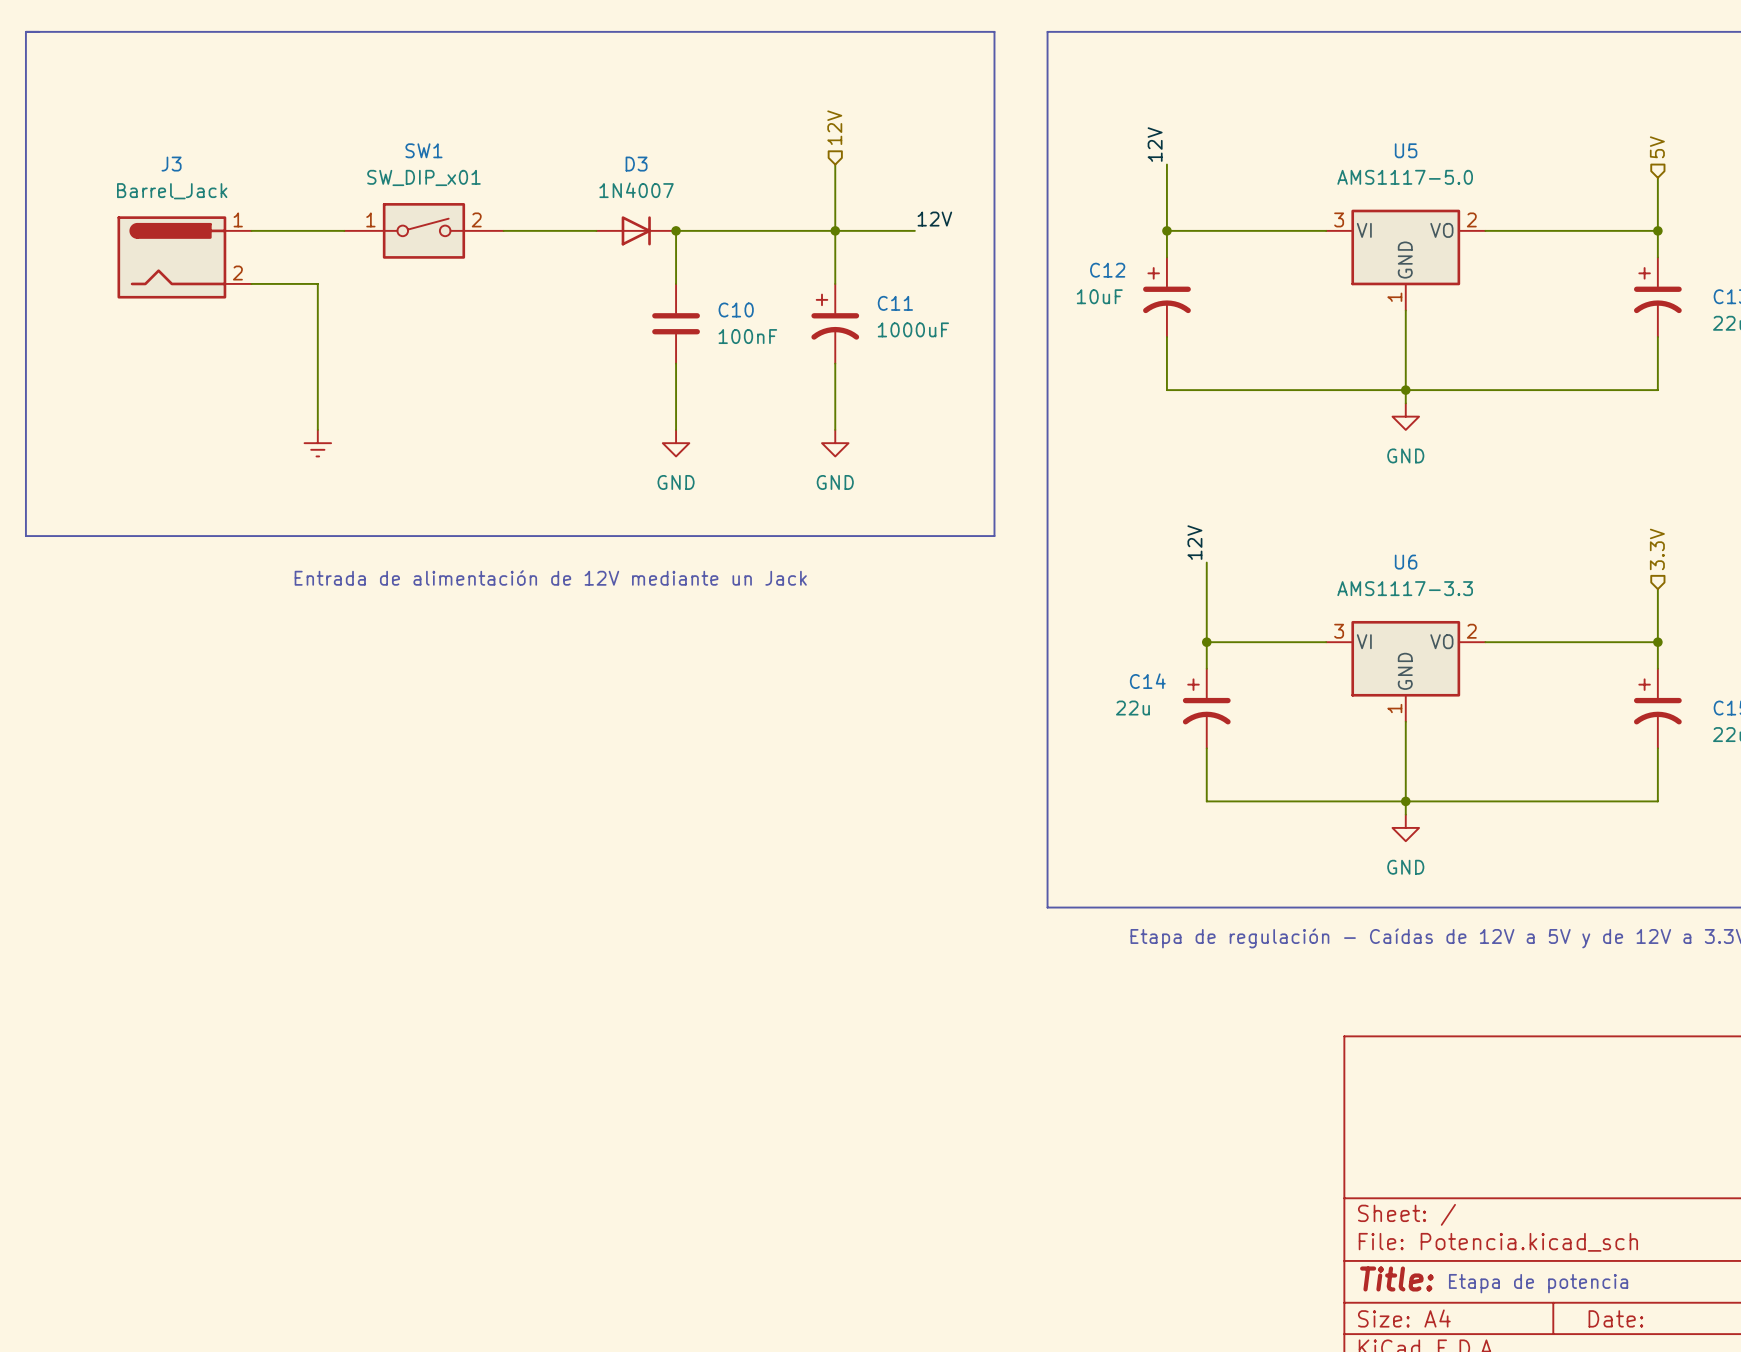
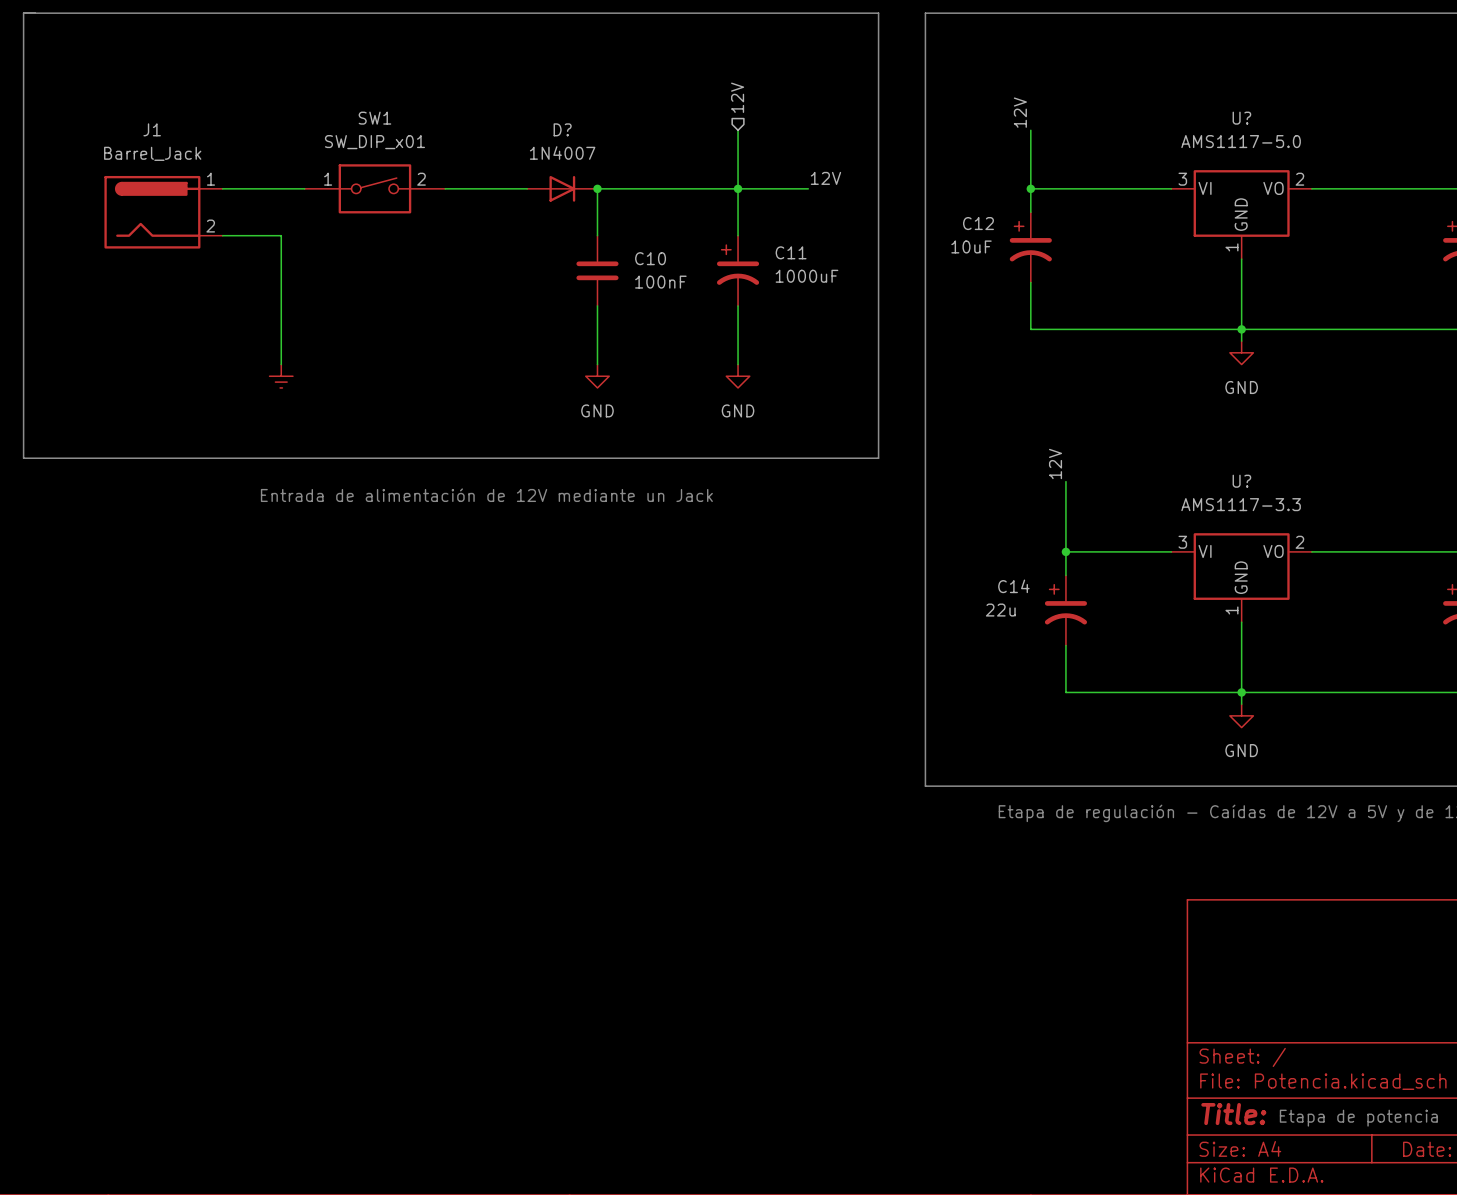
U5 name: U5 (1406, 150) -> U? (1241, 118)
J3 name: J3 (171, 164) -> J1 (152, 129)
D3 name: D3 (636, 164) -> D? (562, 129)
U6 name: U6 (1406, 562) -> U? (1241, 481)

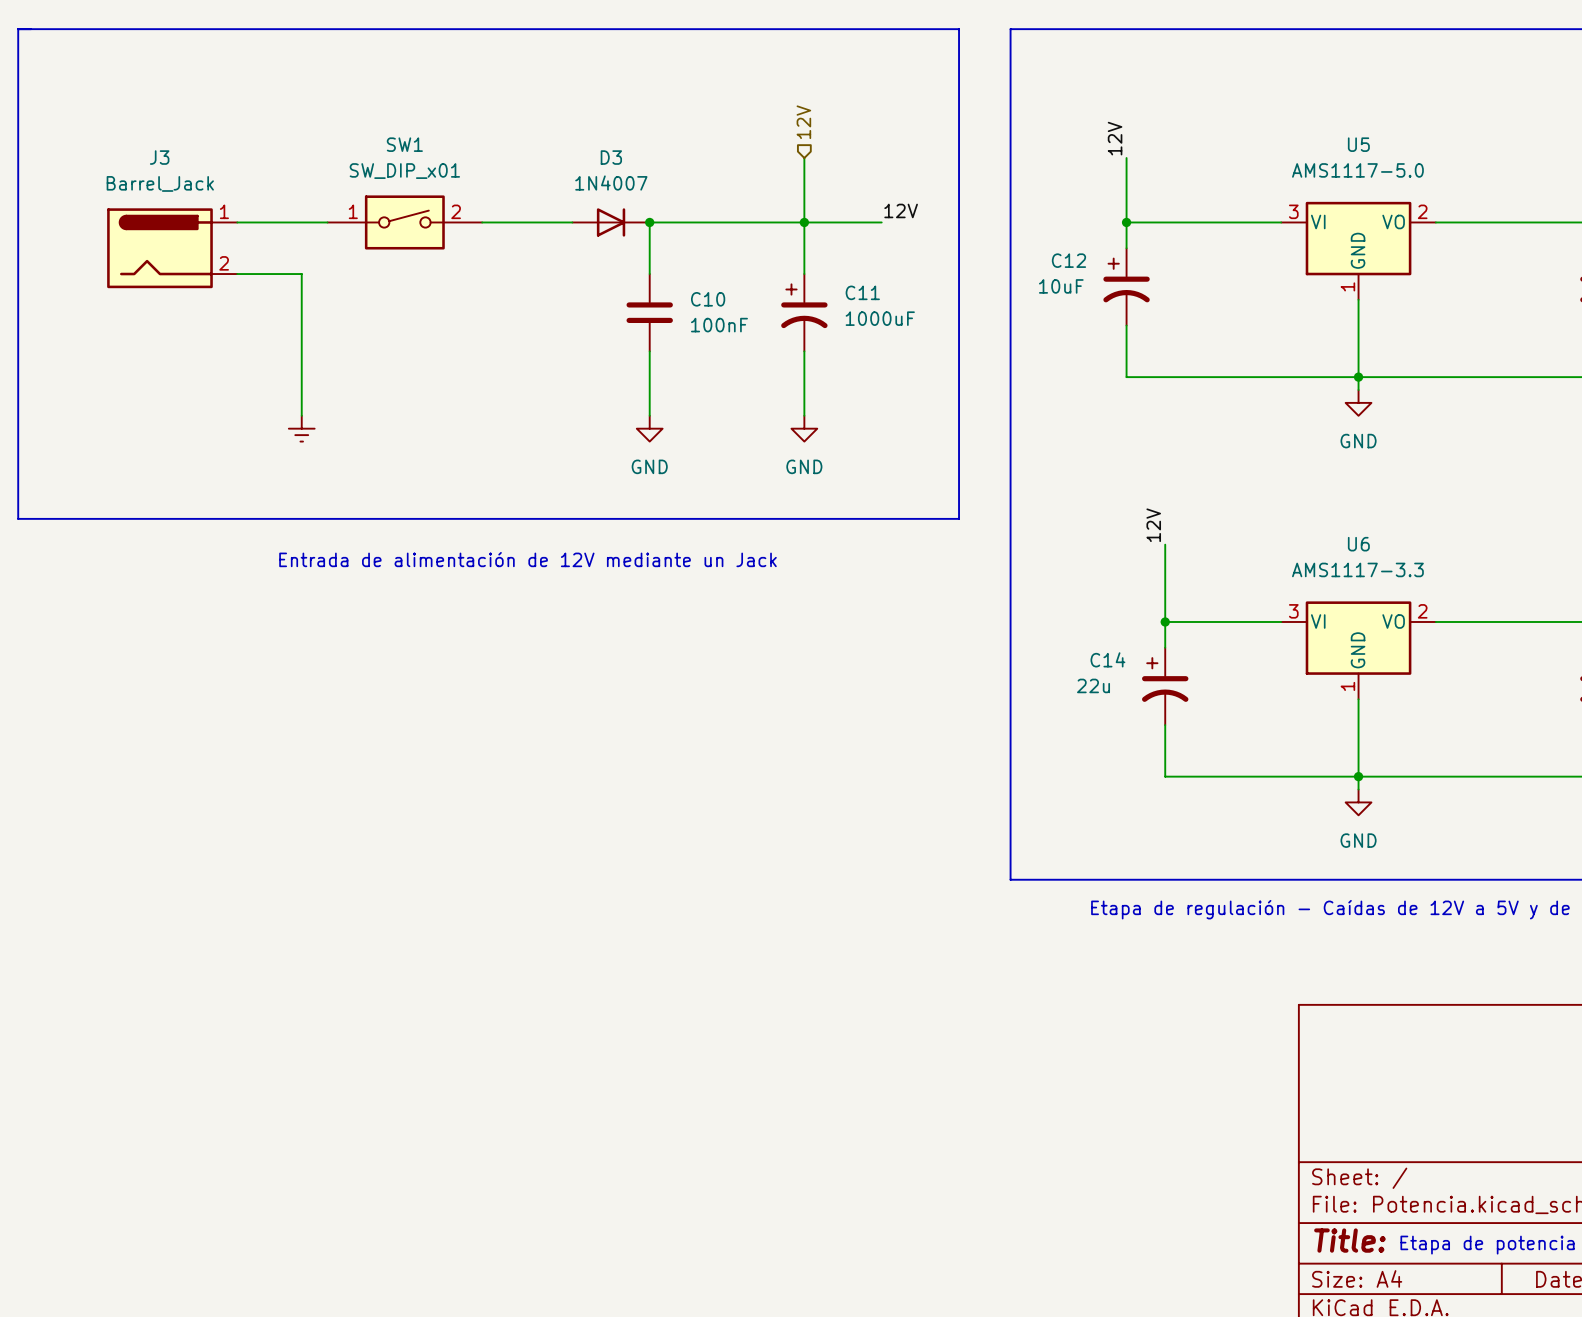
U? name: U? (1241, 118) -> U5 (1358, 144)
J1 name: J1 (152, 129) -> J3 (159, 157)
D? name: D? (562, 129) -> D3 (611, 157)
U? name: U? (1241, 481) -> U6 (1358, 544)

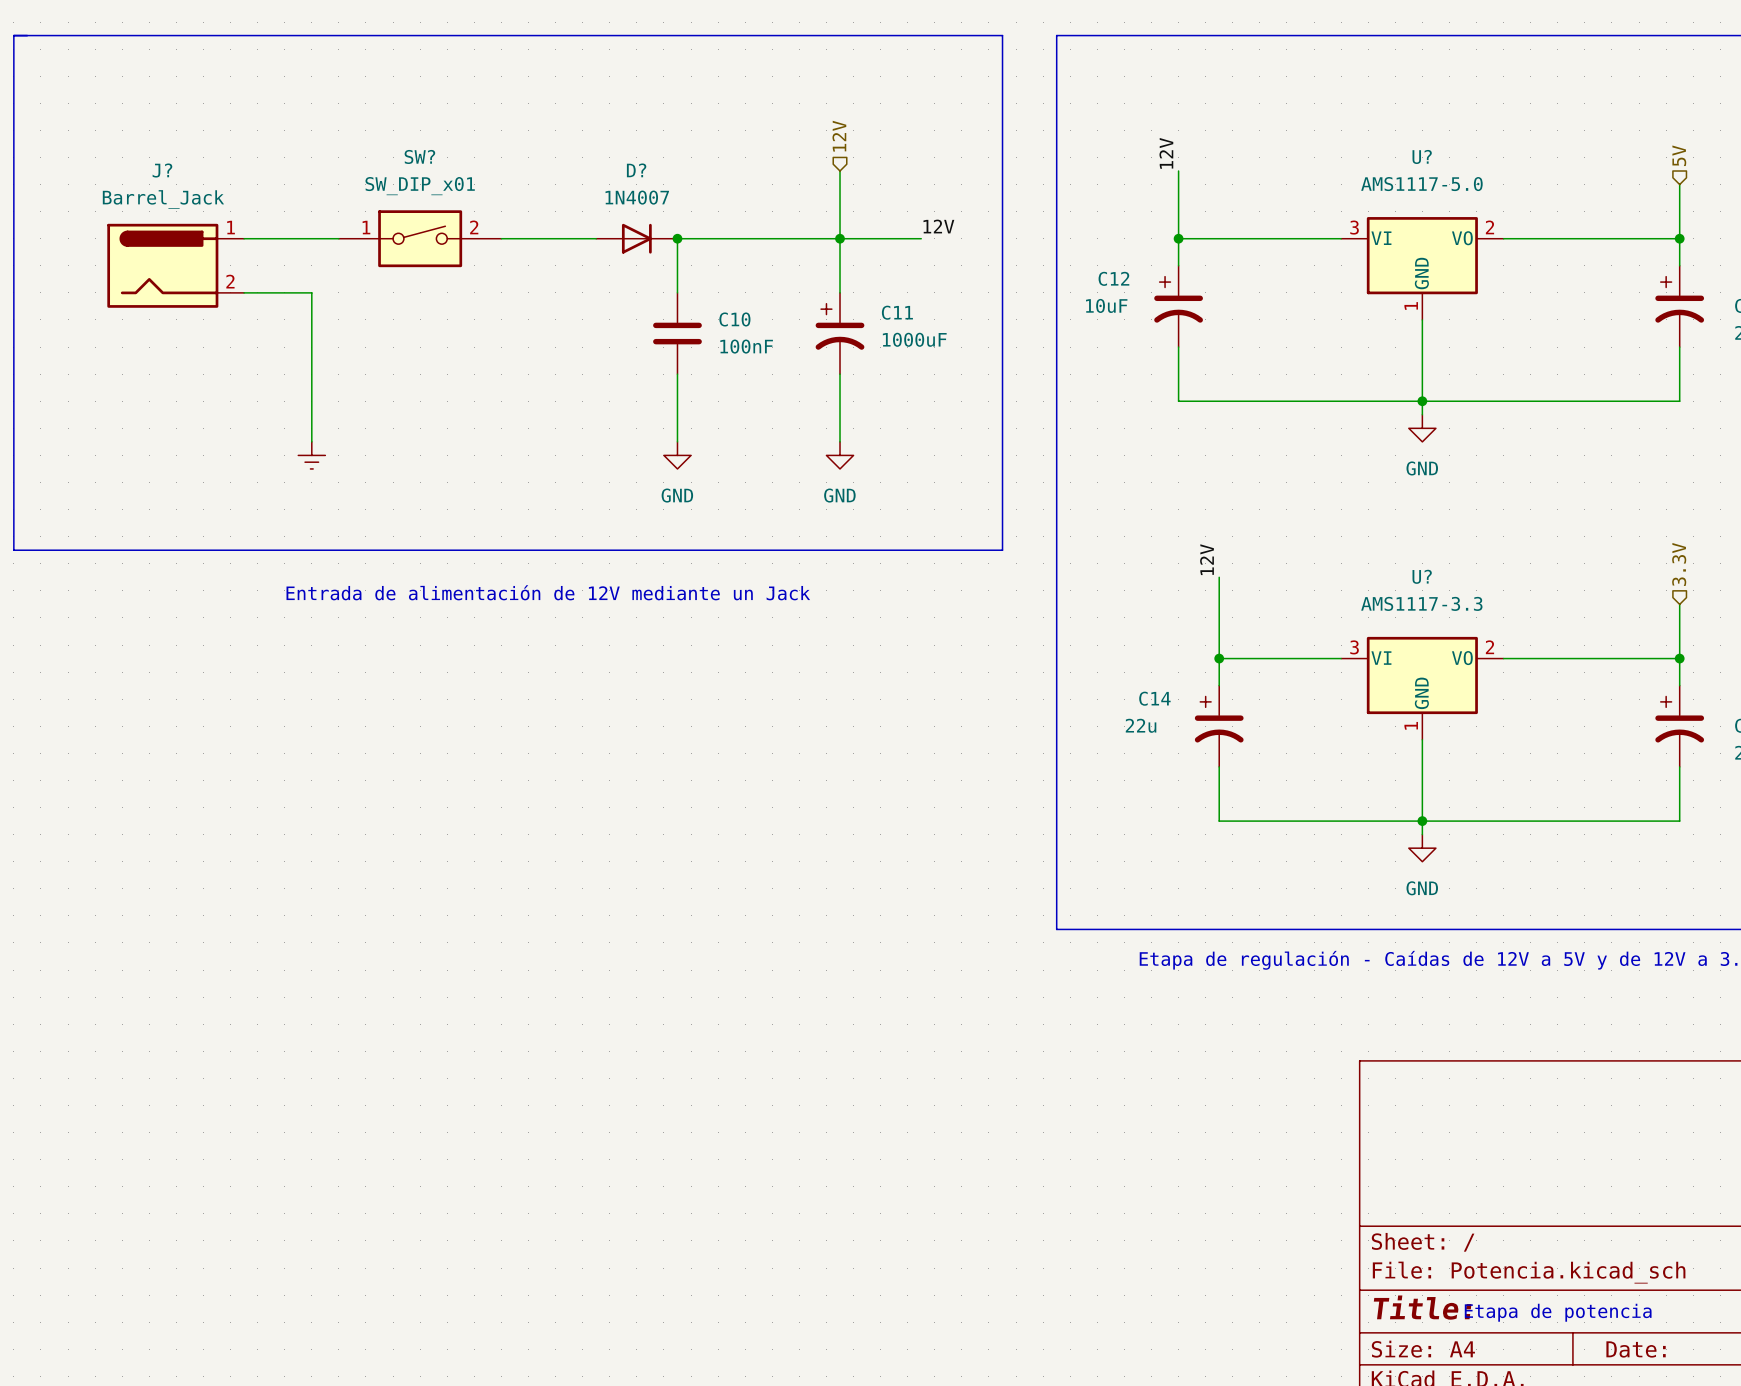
SW1 name: SW1 (404, 144) -> SW? (419, 156)
U5 name: U5 (1358, 144) -> U? (1422, 156)
J3 name: J3 (159, 157) -> J? (162, 170)
D3 name: D3 (611, 157) -> D? (636, 170)
U6 name: U6 (1358, 544) -> U? (1422, 576)

